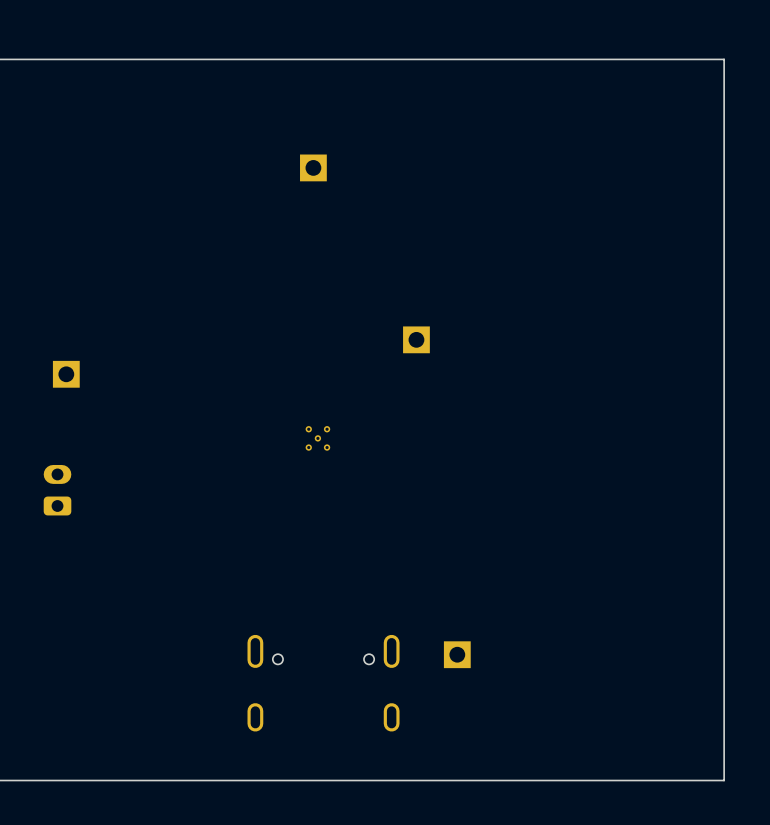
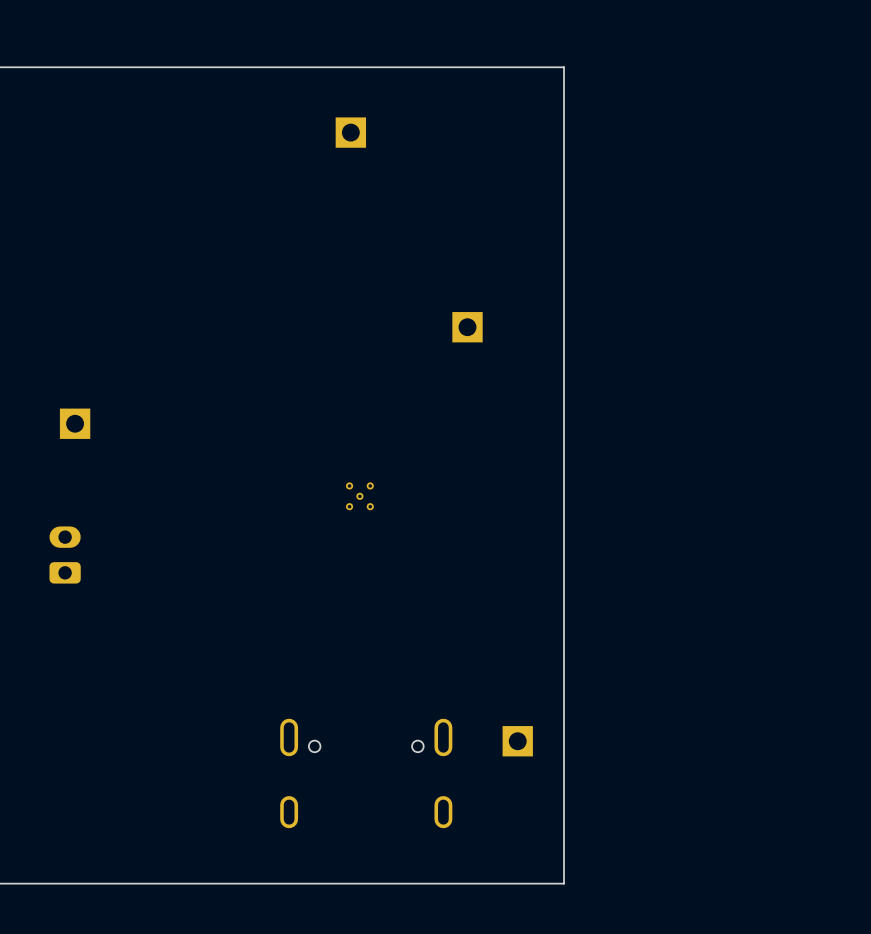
board edge: (498, 59) (724, 59) (724, 780) (498, 780) -> (564, 67) (564, 883)
part position: (313, 167) -> (350, 132)
part position: (416, 339) -> (467, 327)

